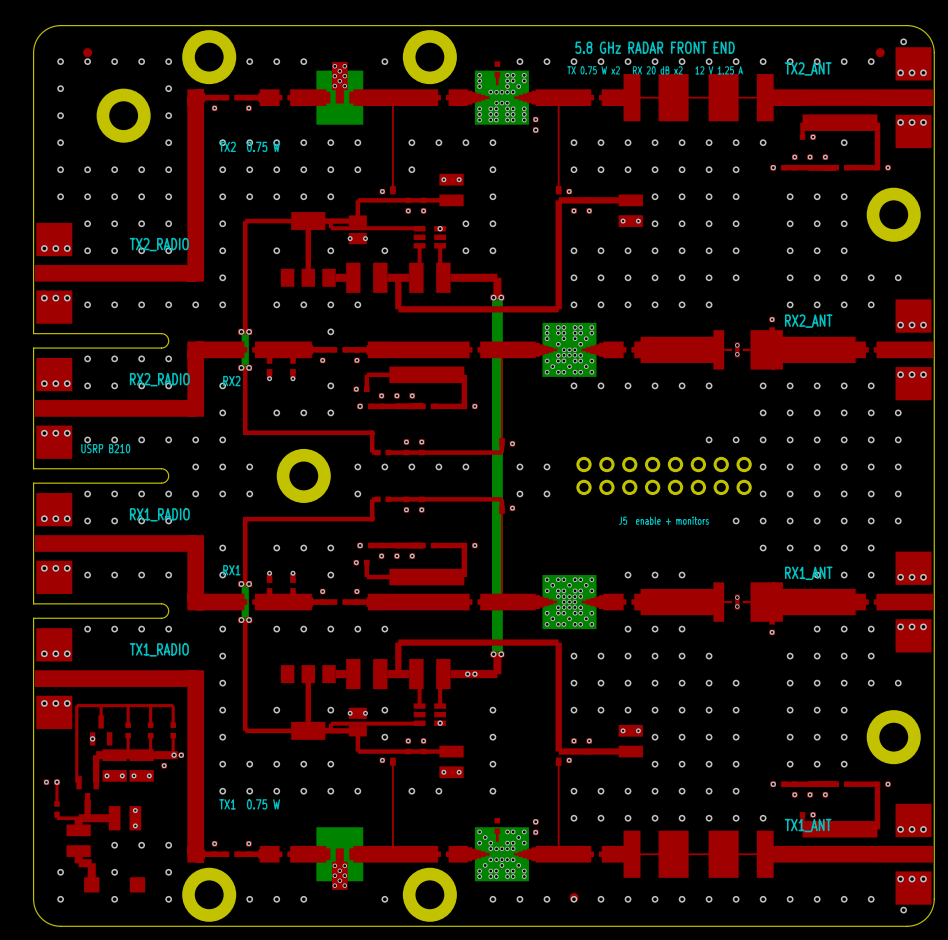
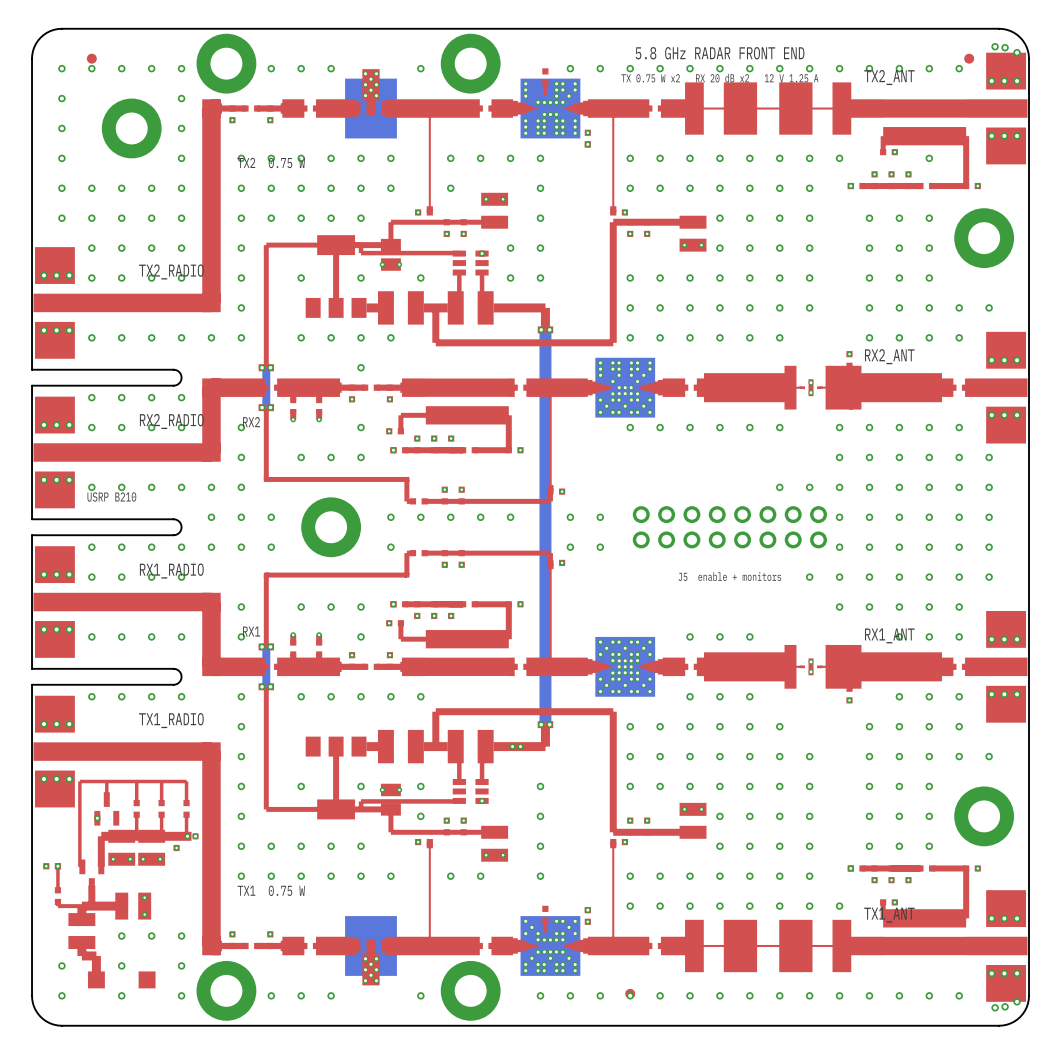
via: none -> (1005, 47)
via: none -> (1017, 52)
via: none -> (1017, 1001)
via: none -> (1005, 1006)

